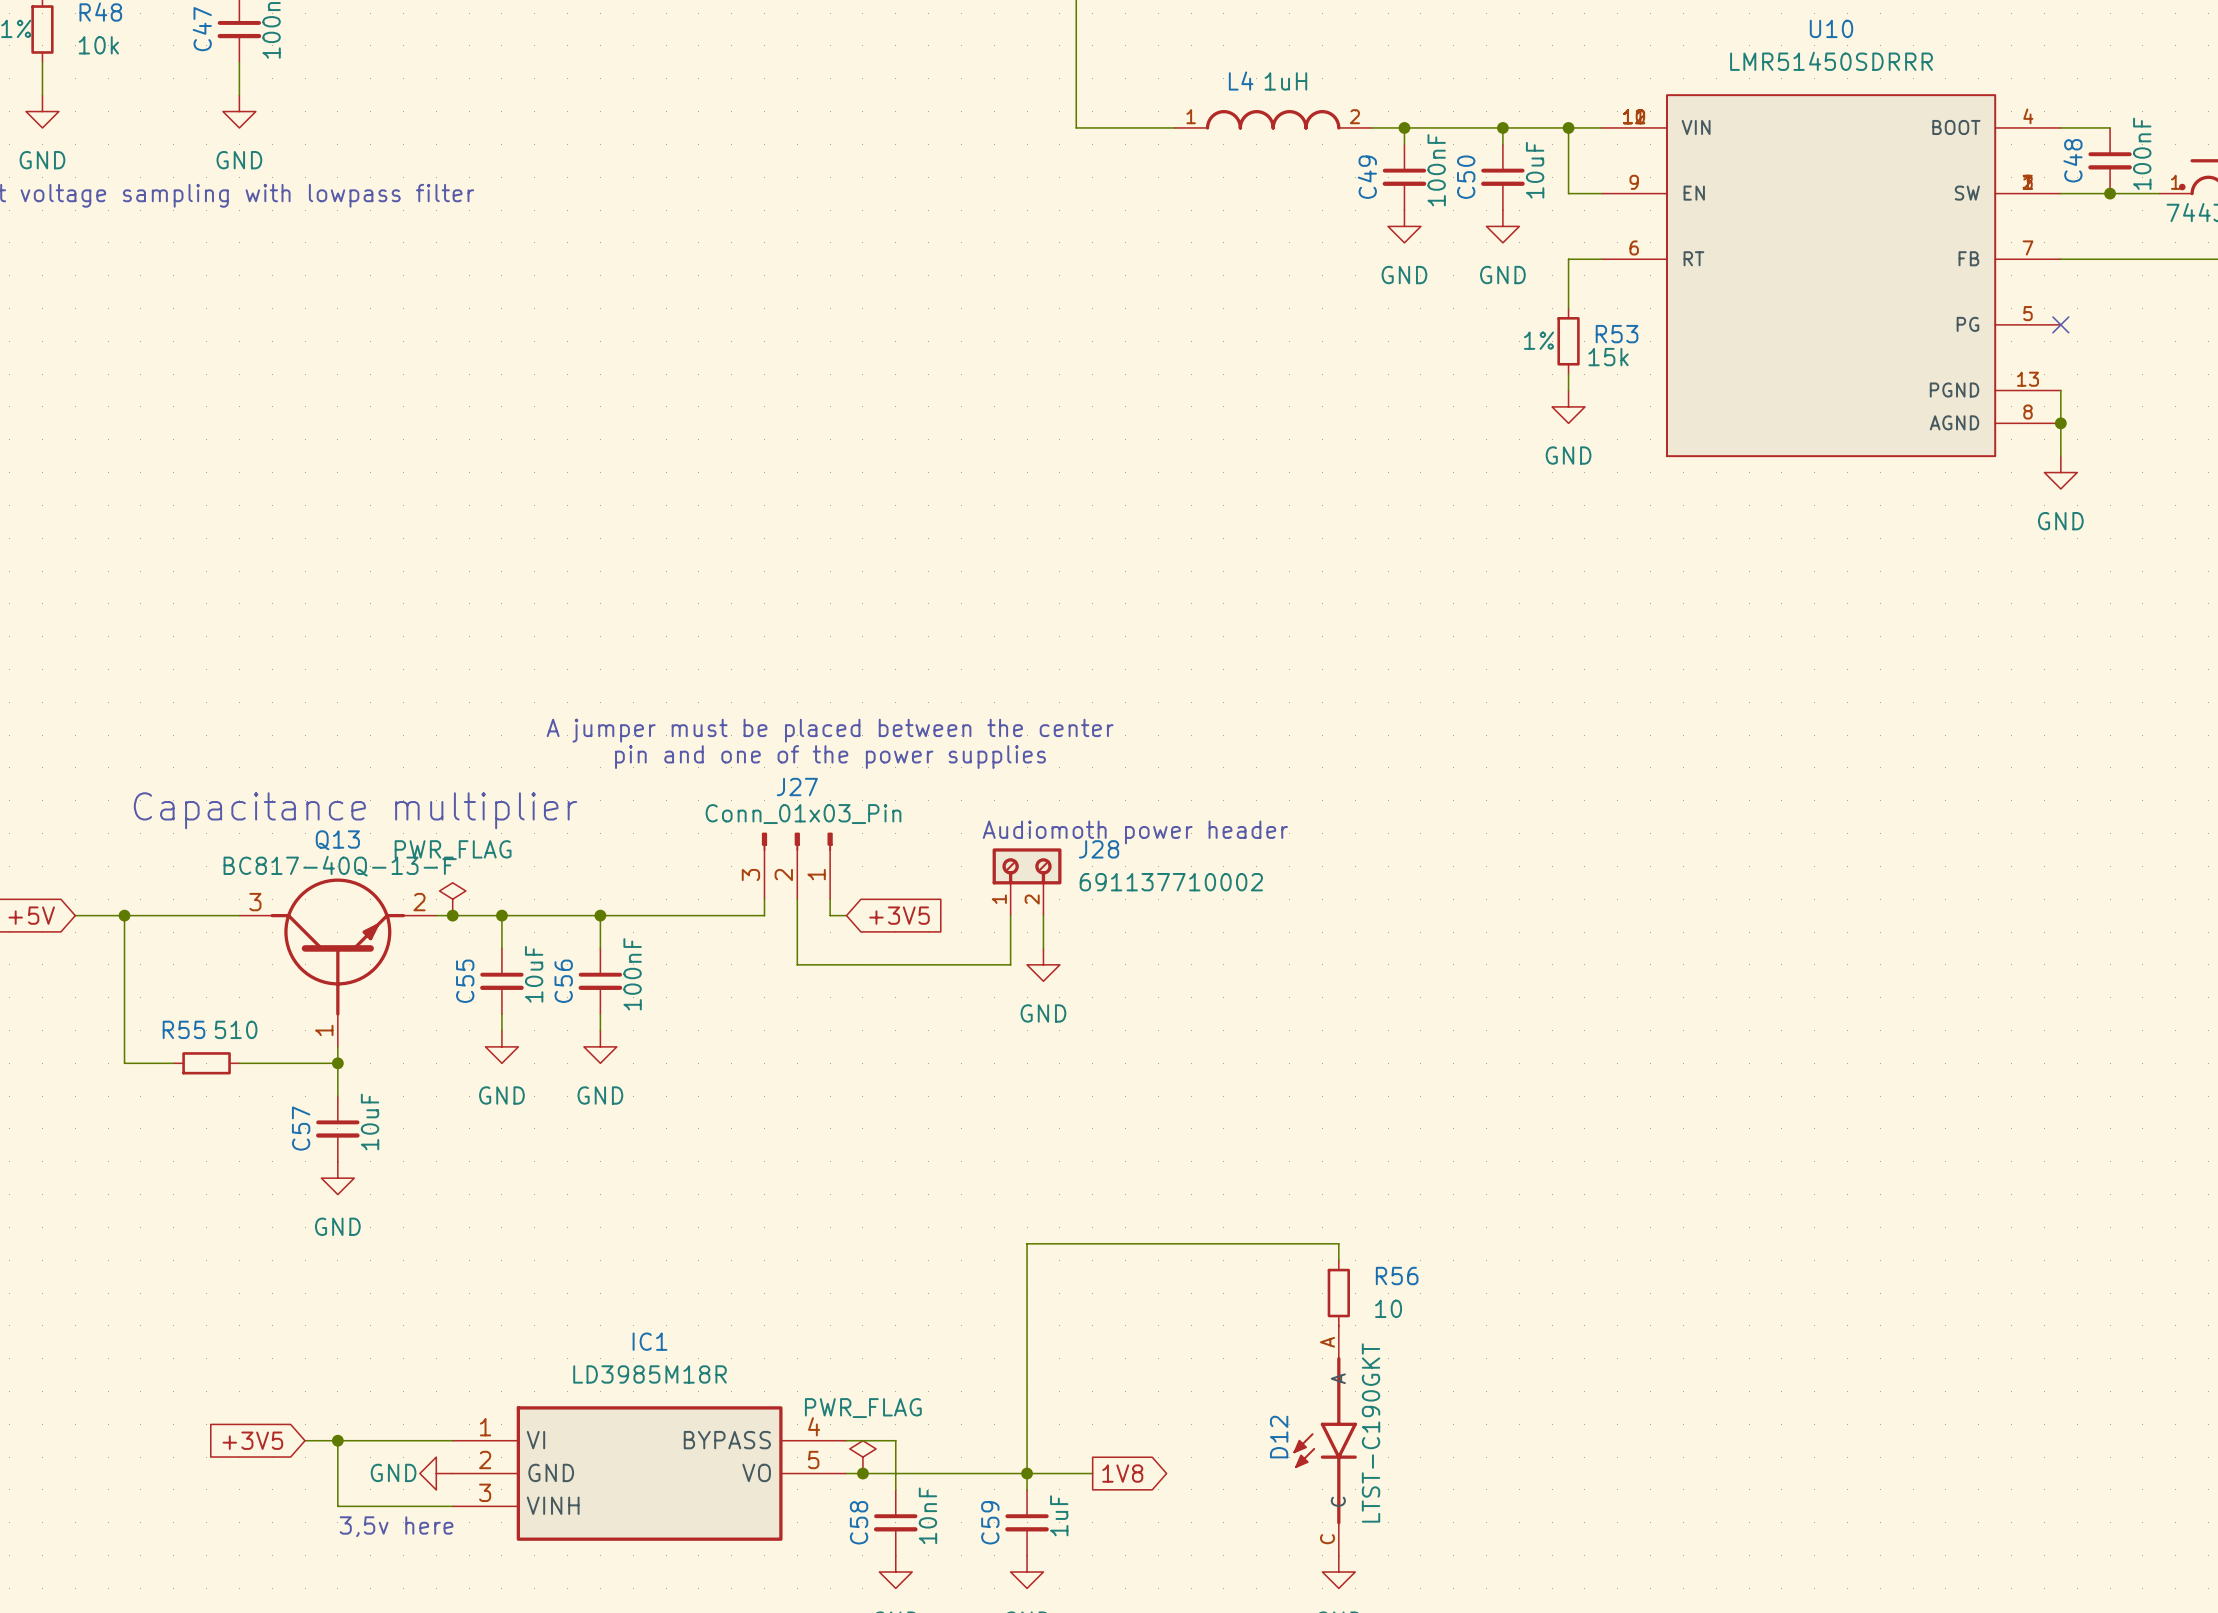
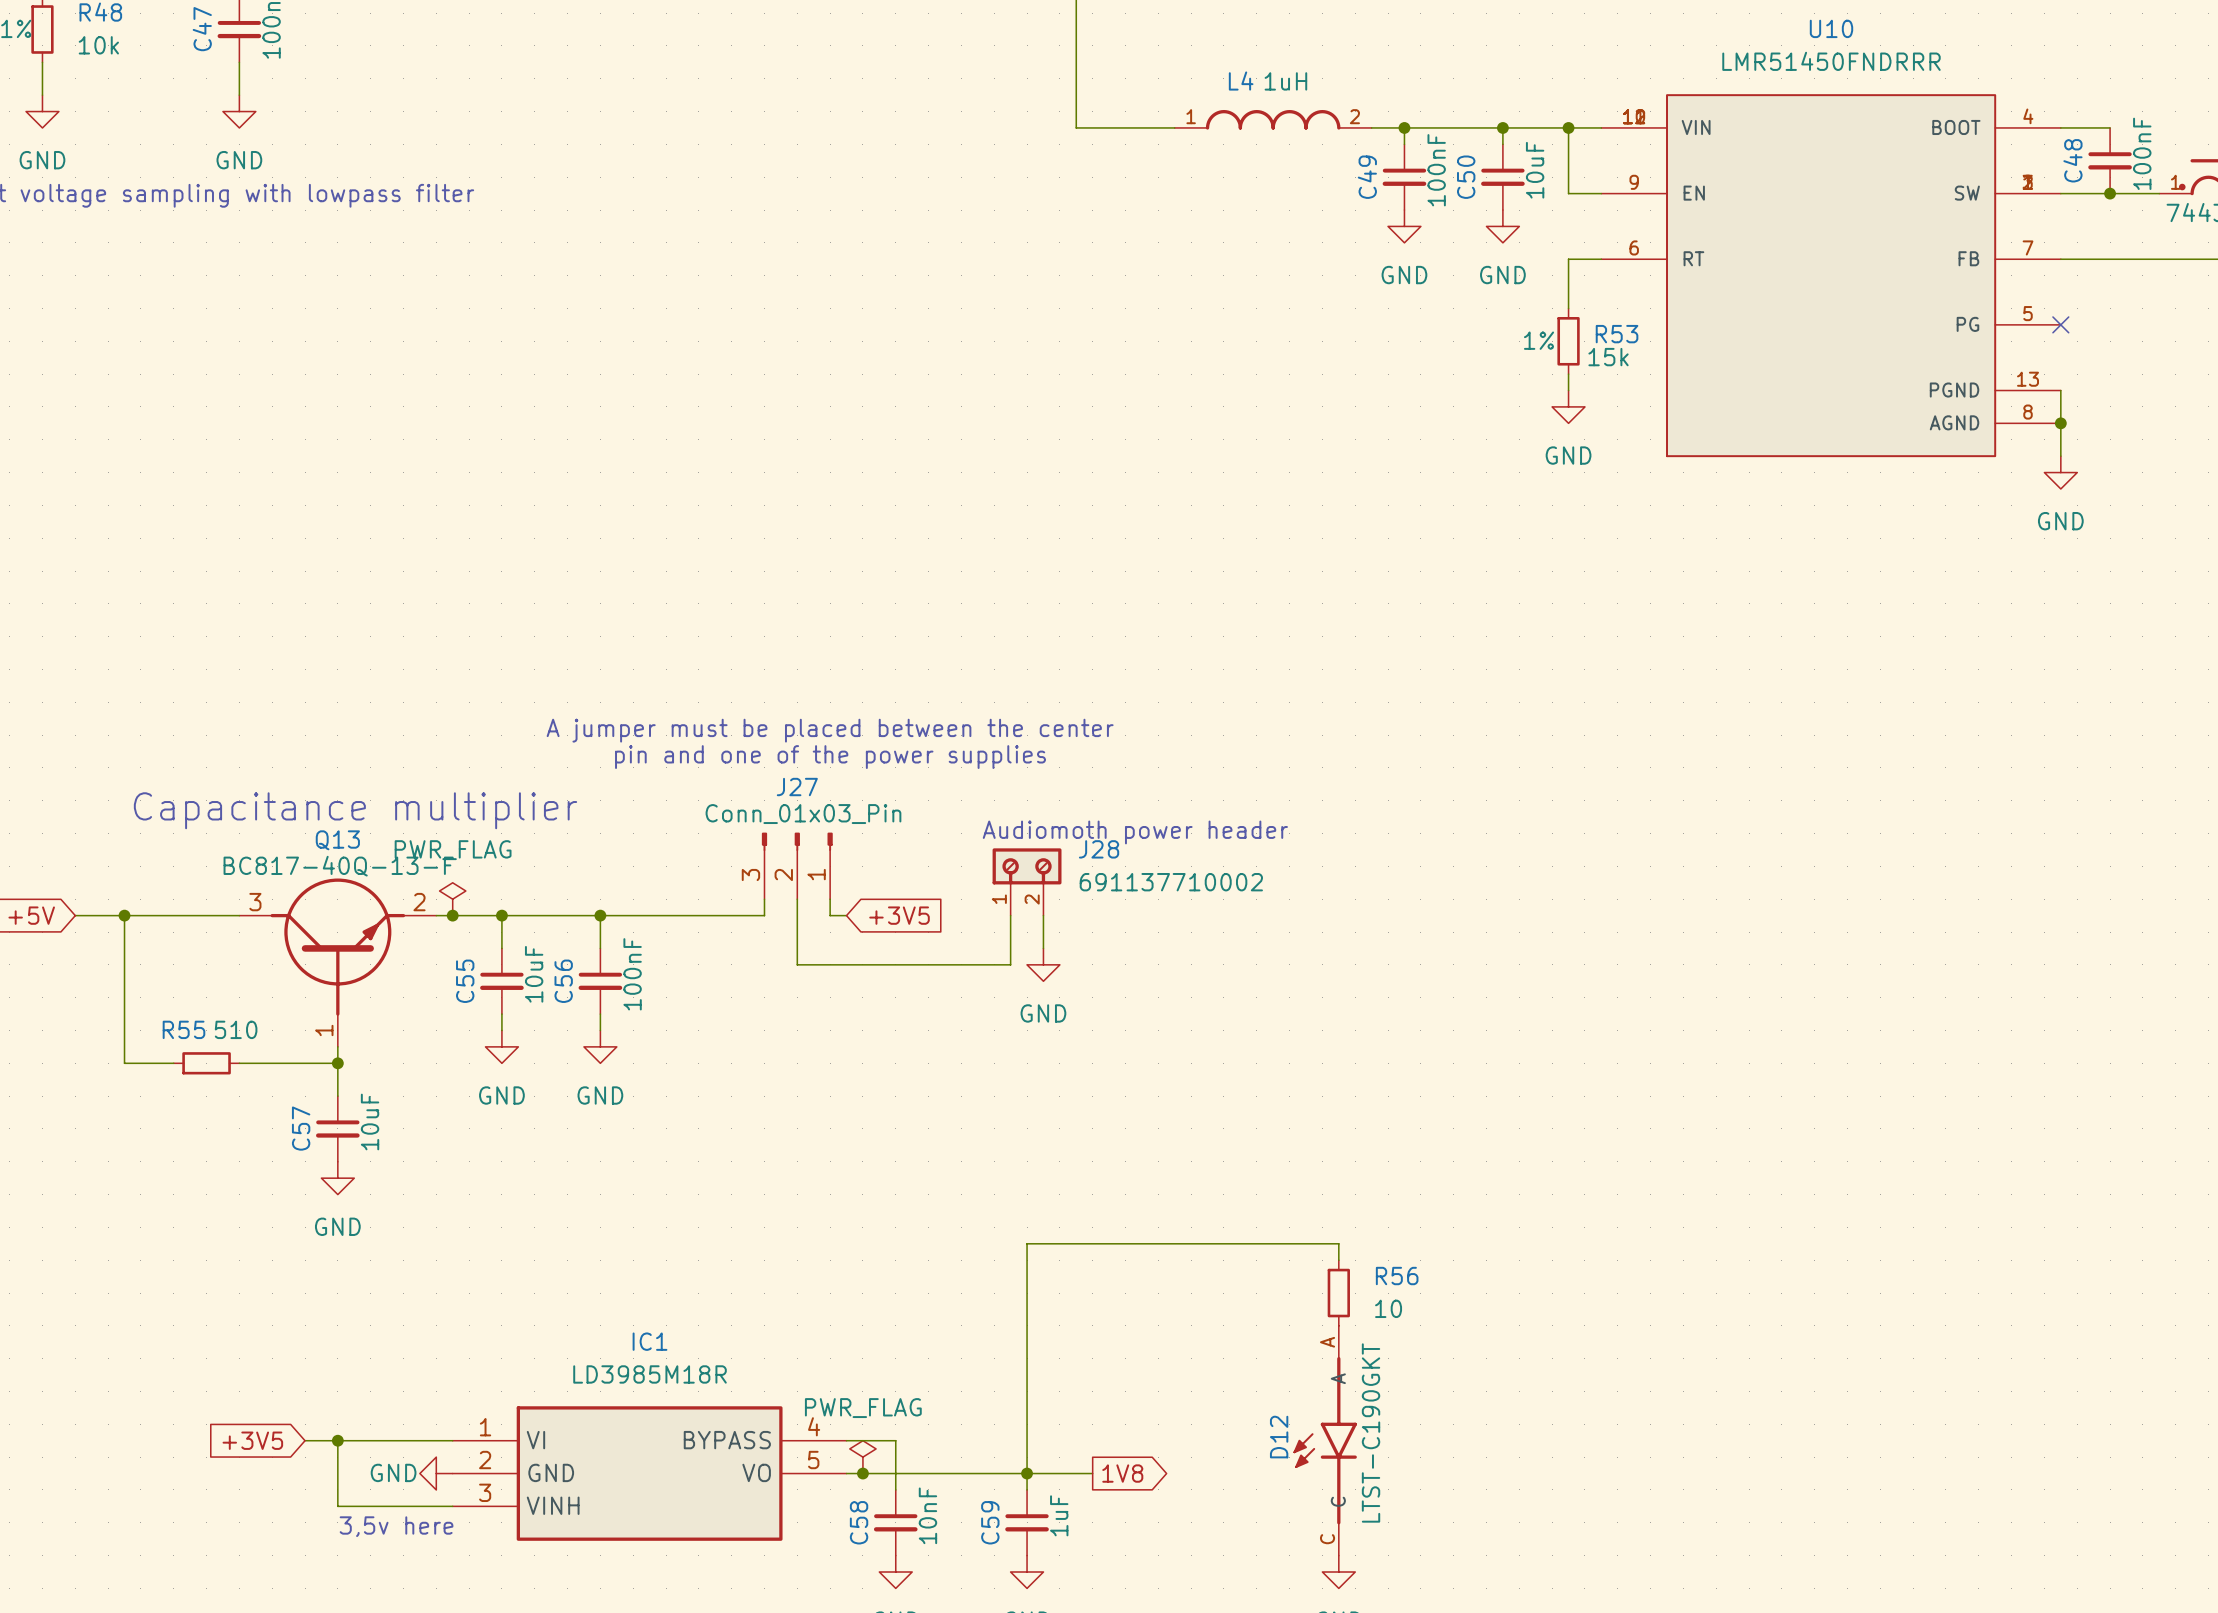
U10 value: LMR51450SDRRR (1831, 61) -> LMR51450FNDRRR (1831, 61)

